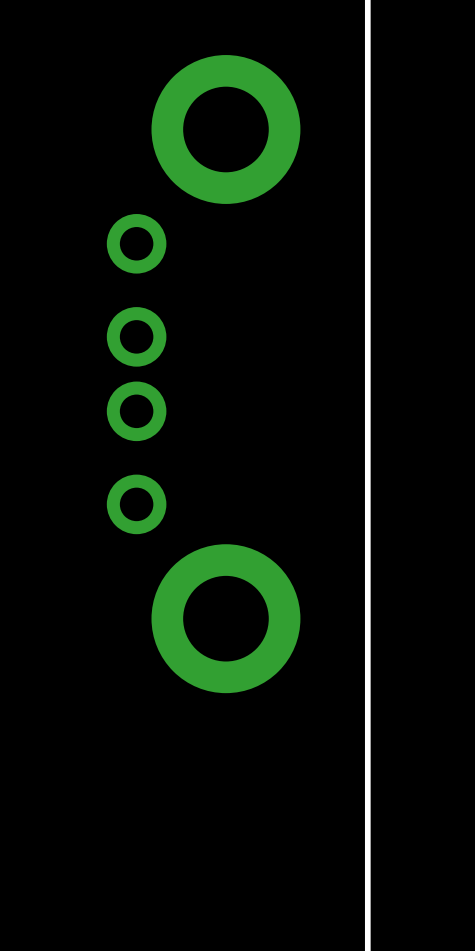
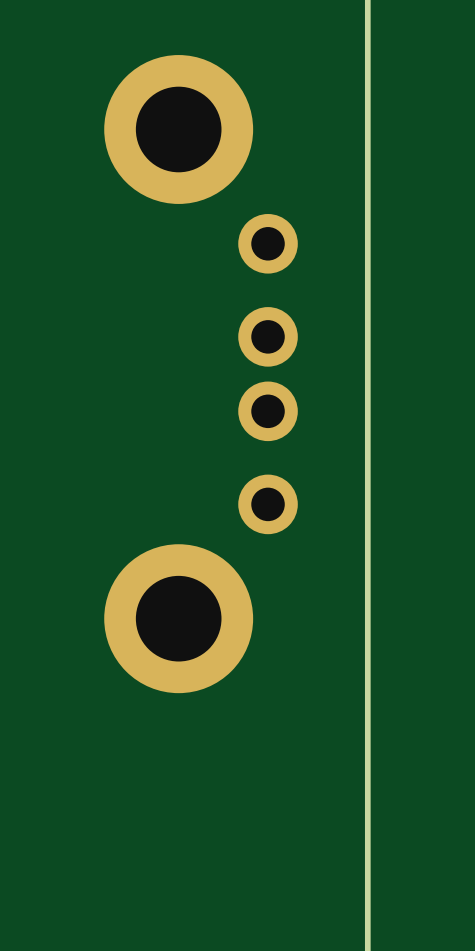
part rotation: 0° (203, 374) -> 180° (201, 374)

